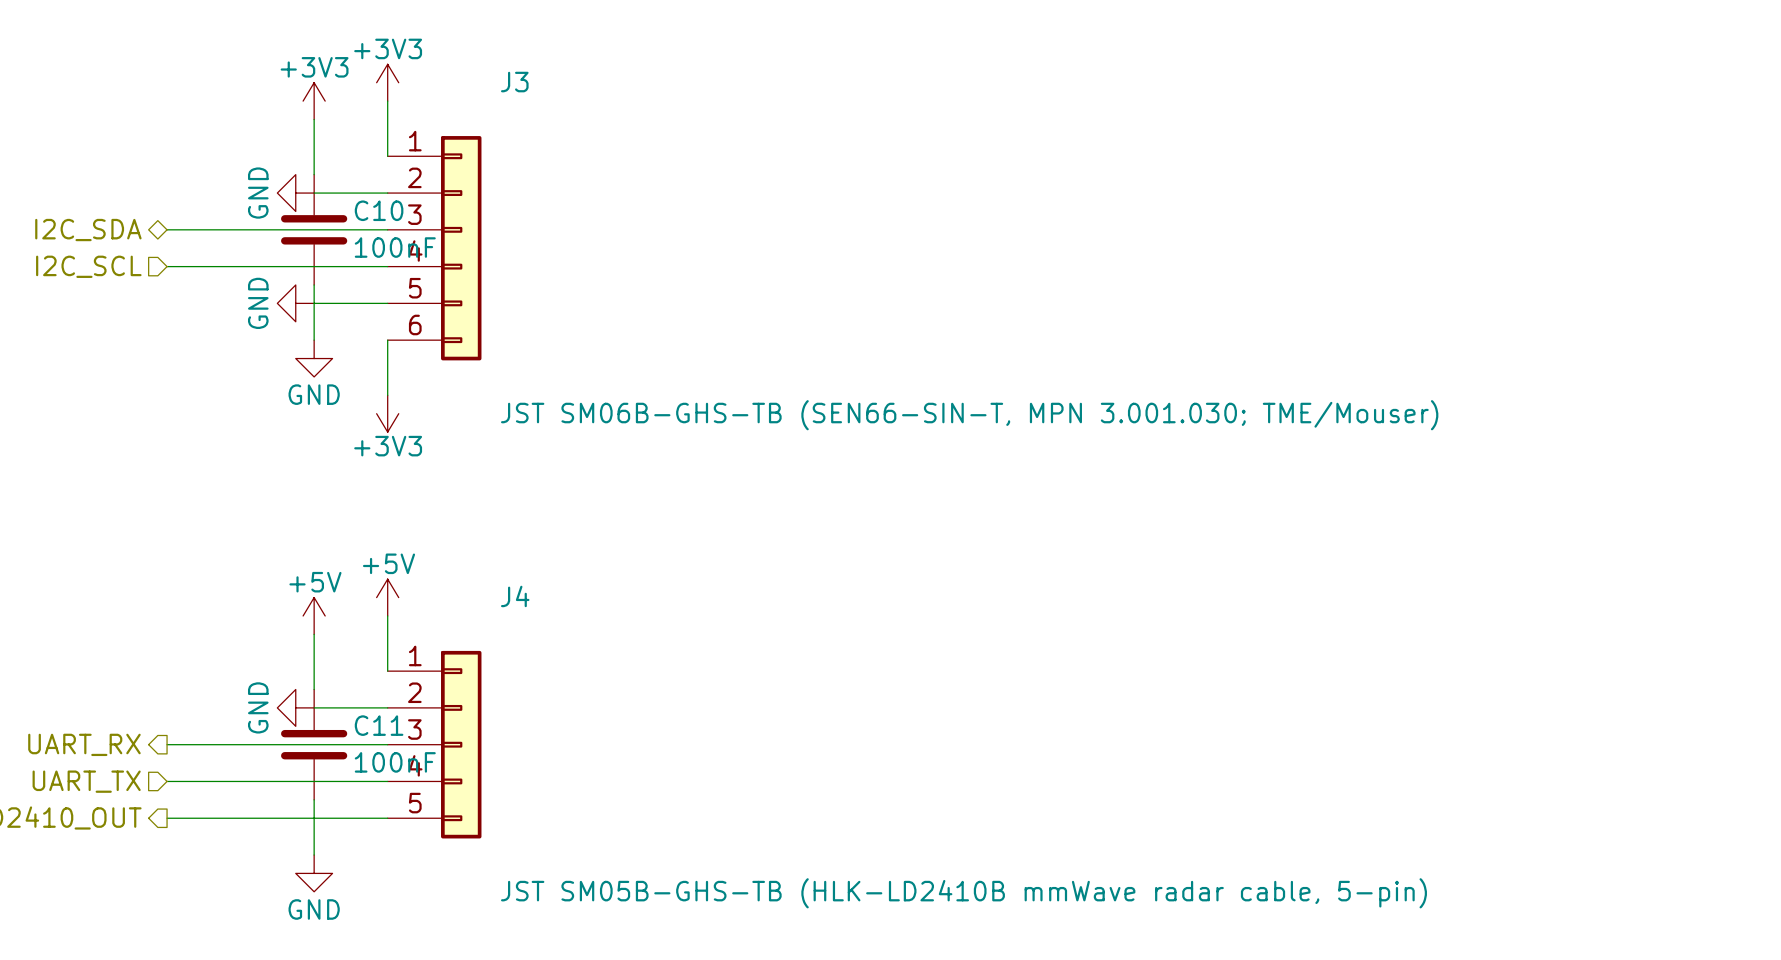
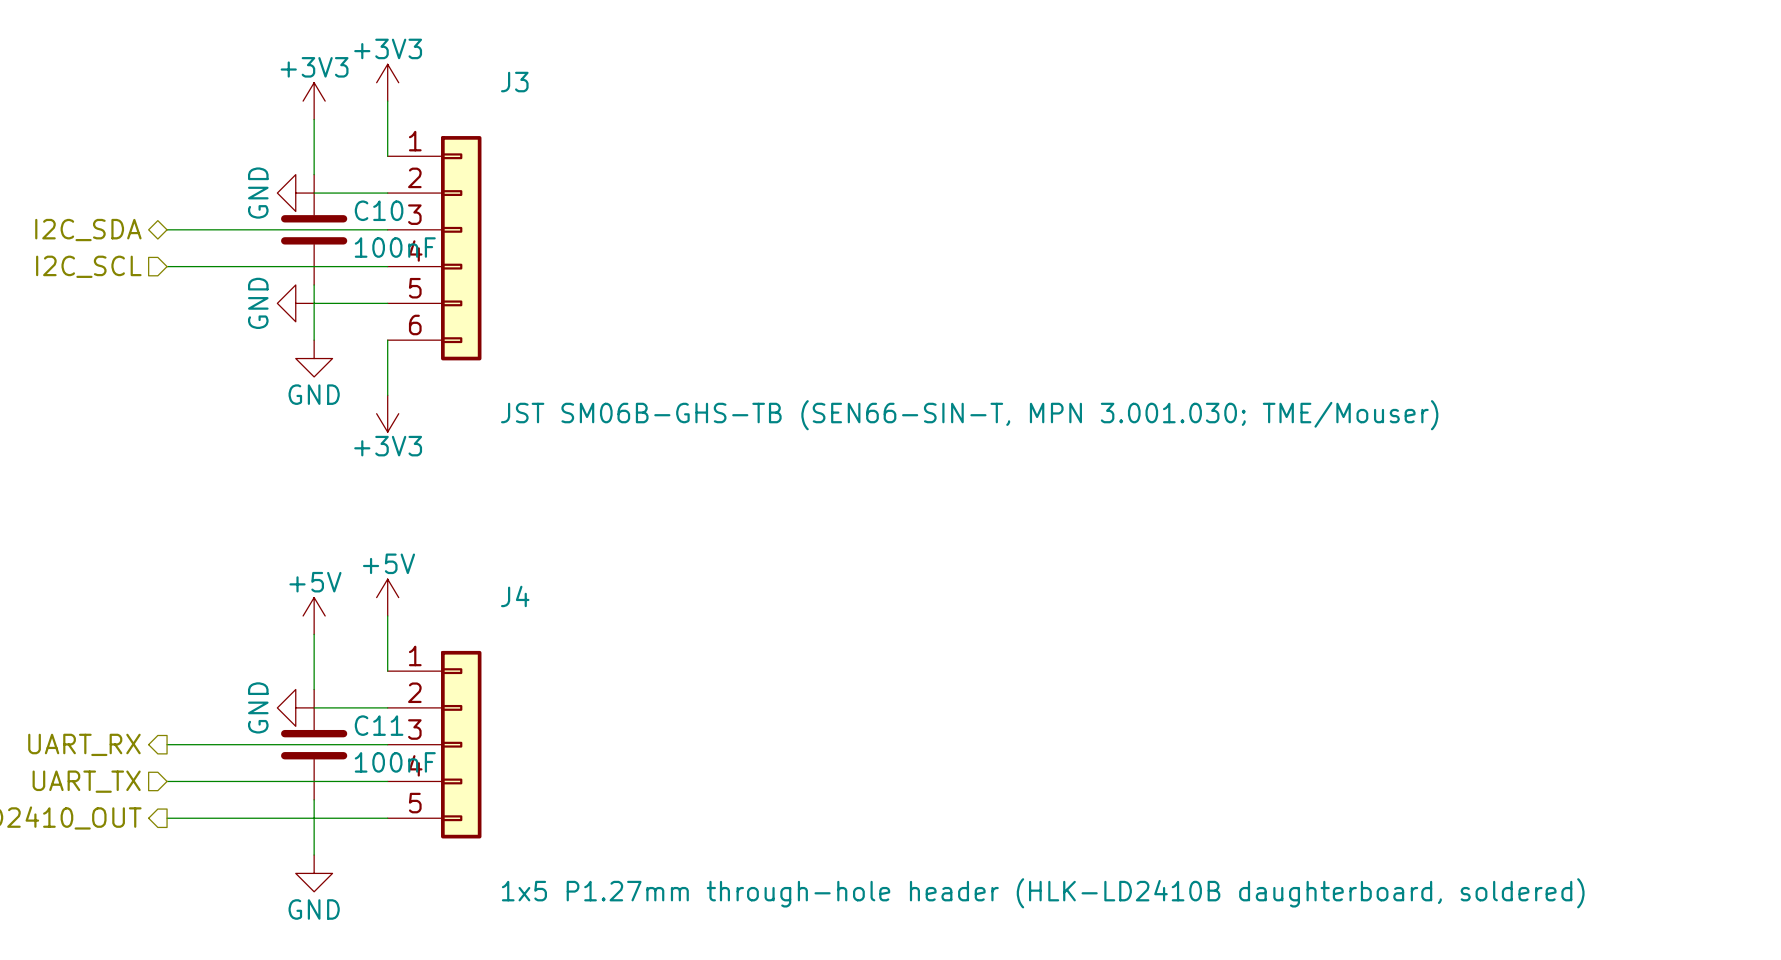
J4 value: JST SM05B-GHS-TB (HLK-LD2410B mmWave radar cable, 5-pin) (963, 893) -> 1x5 P1.27mm through-hole header (HLK-LD2410B daughterboard, soldered) (1043, 893)

